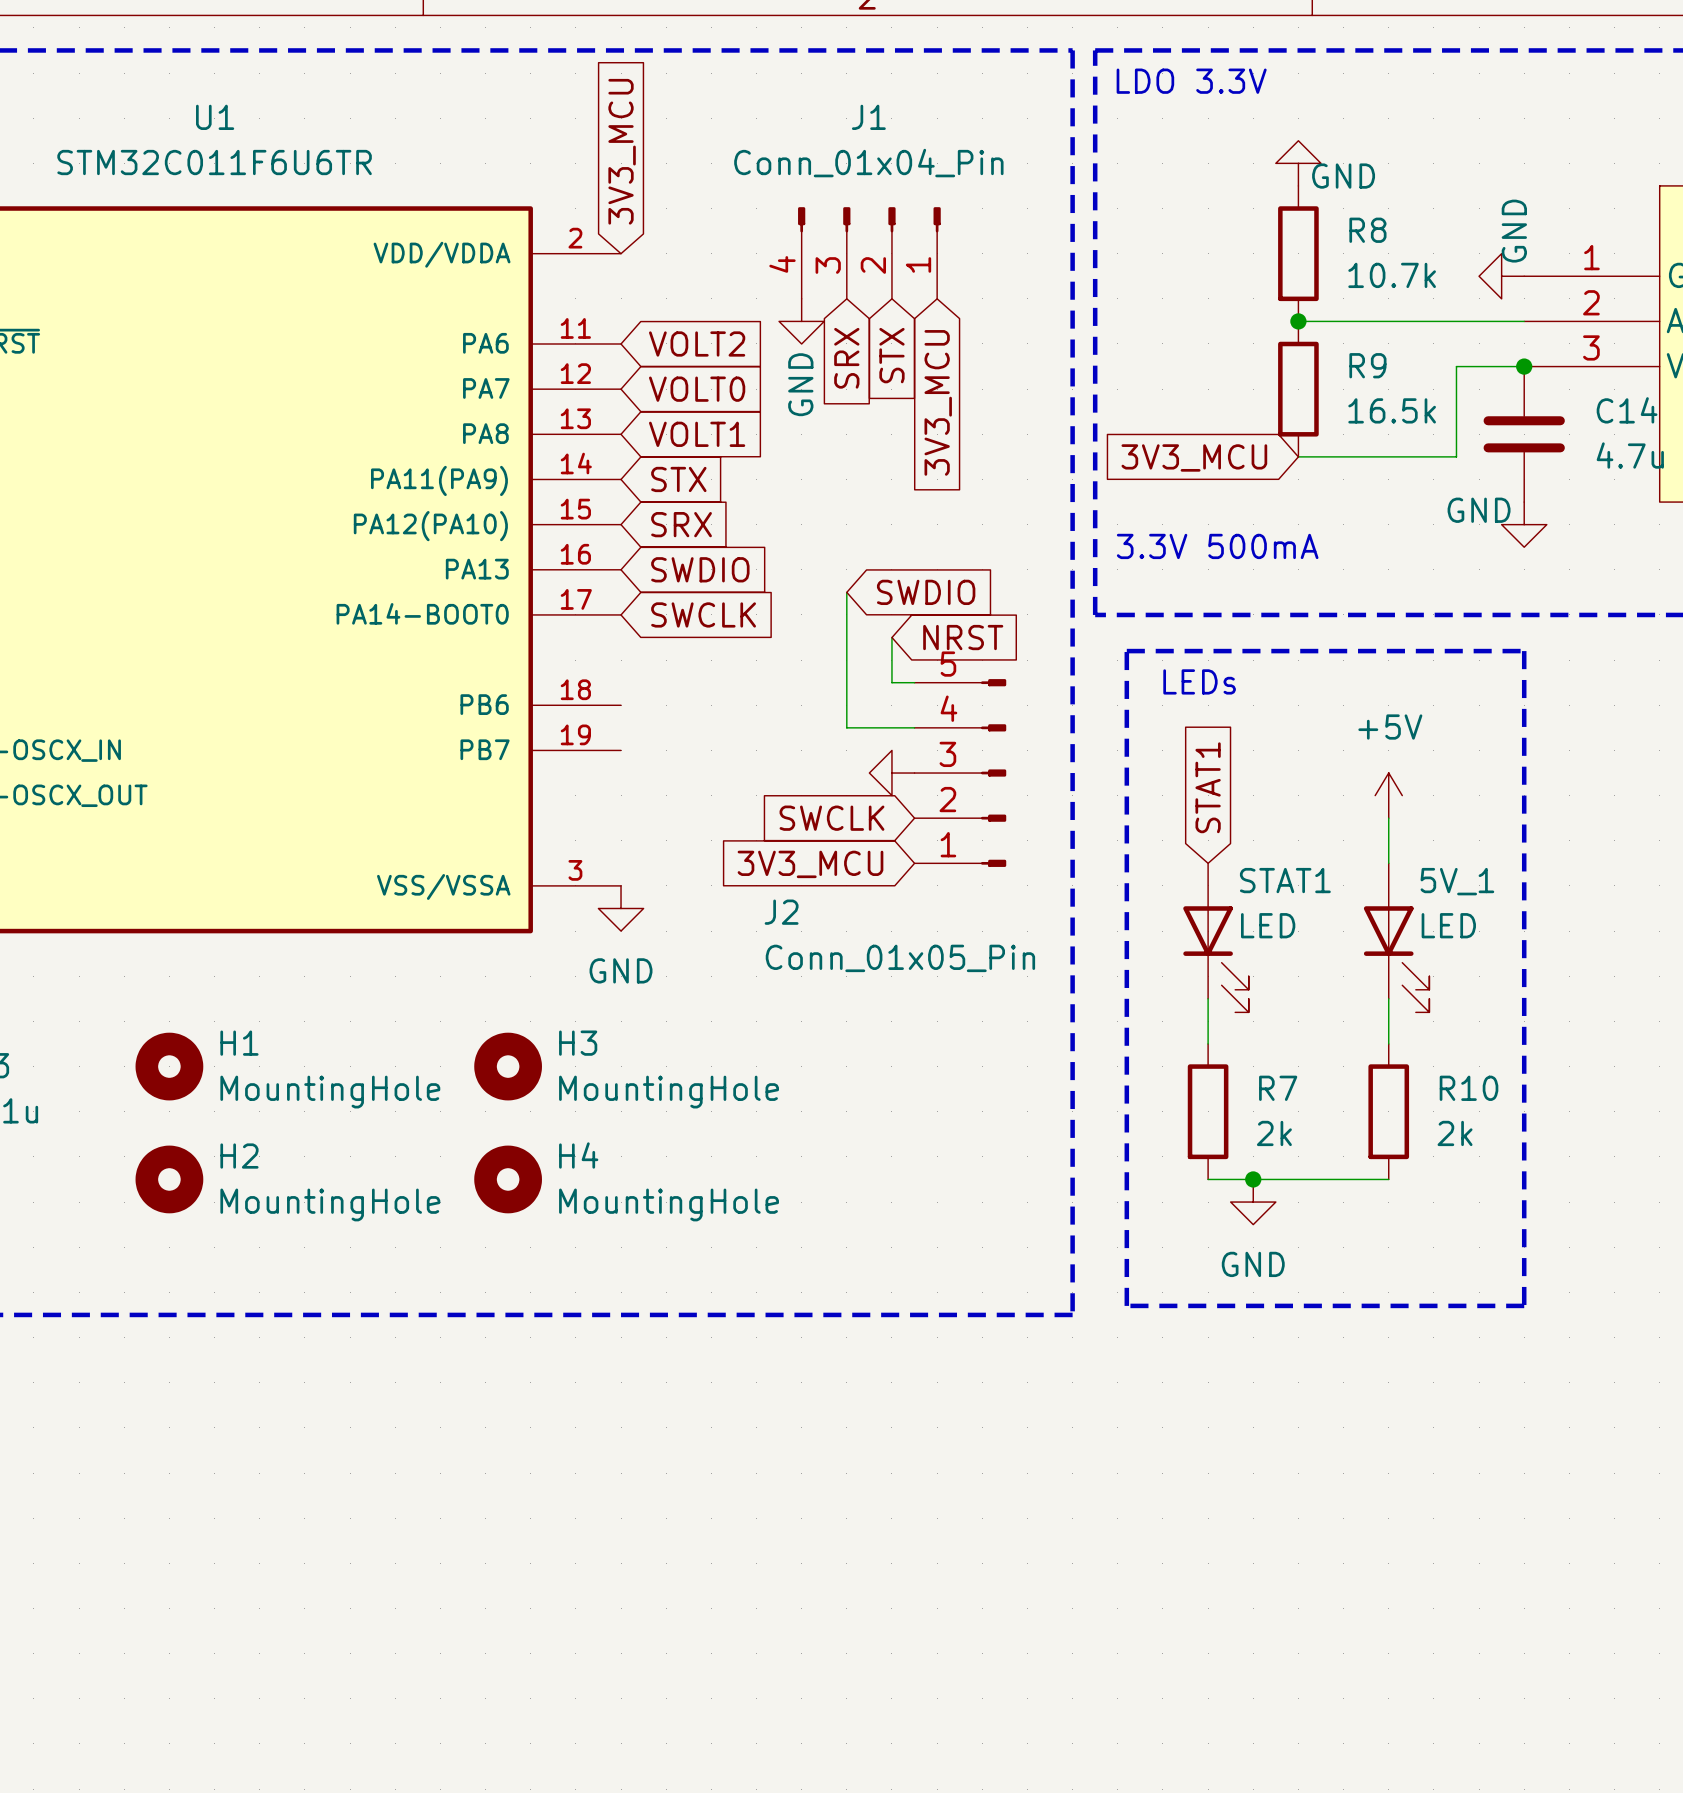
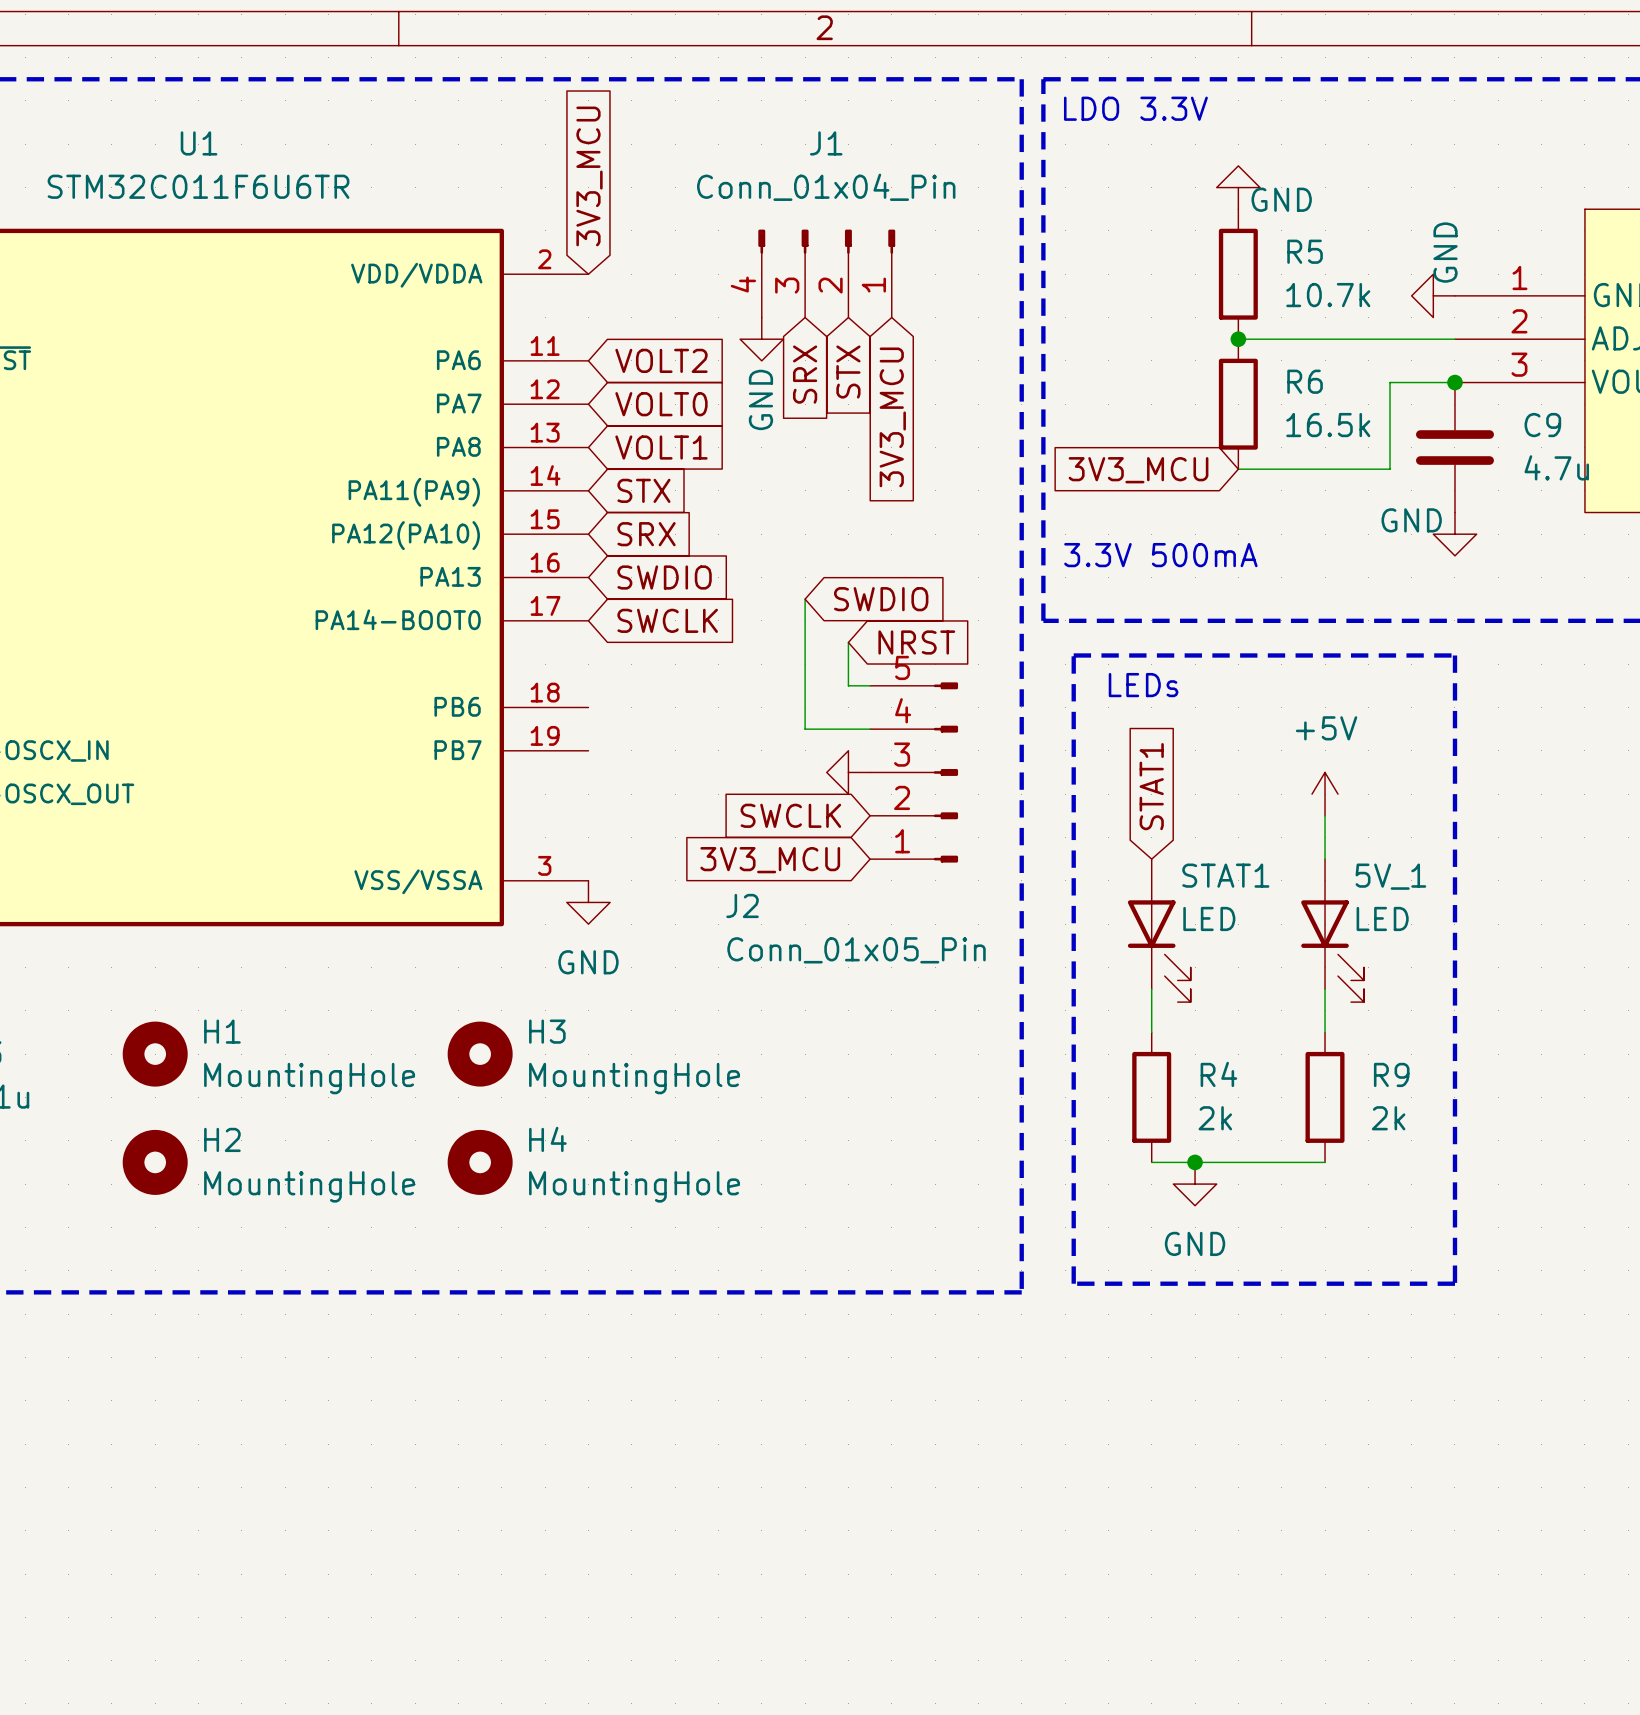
R8 name: R8 (1367, 230) -> R5 (1305, 251)
R9 name: R9 (1367, 365) -> R6 (1305, 381)
C14 name: C14 (1627, 410) -> C9 (1542, 425)
R7 name: R7 (1278, 1088) -> R4 (1218, 1074)
R10 name: R10 (1469, 1088) -> R9 (1391, 1074)

